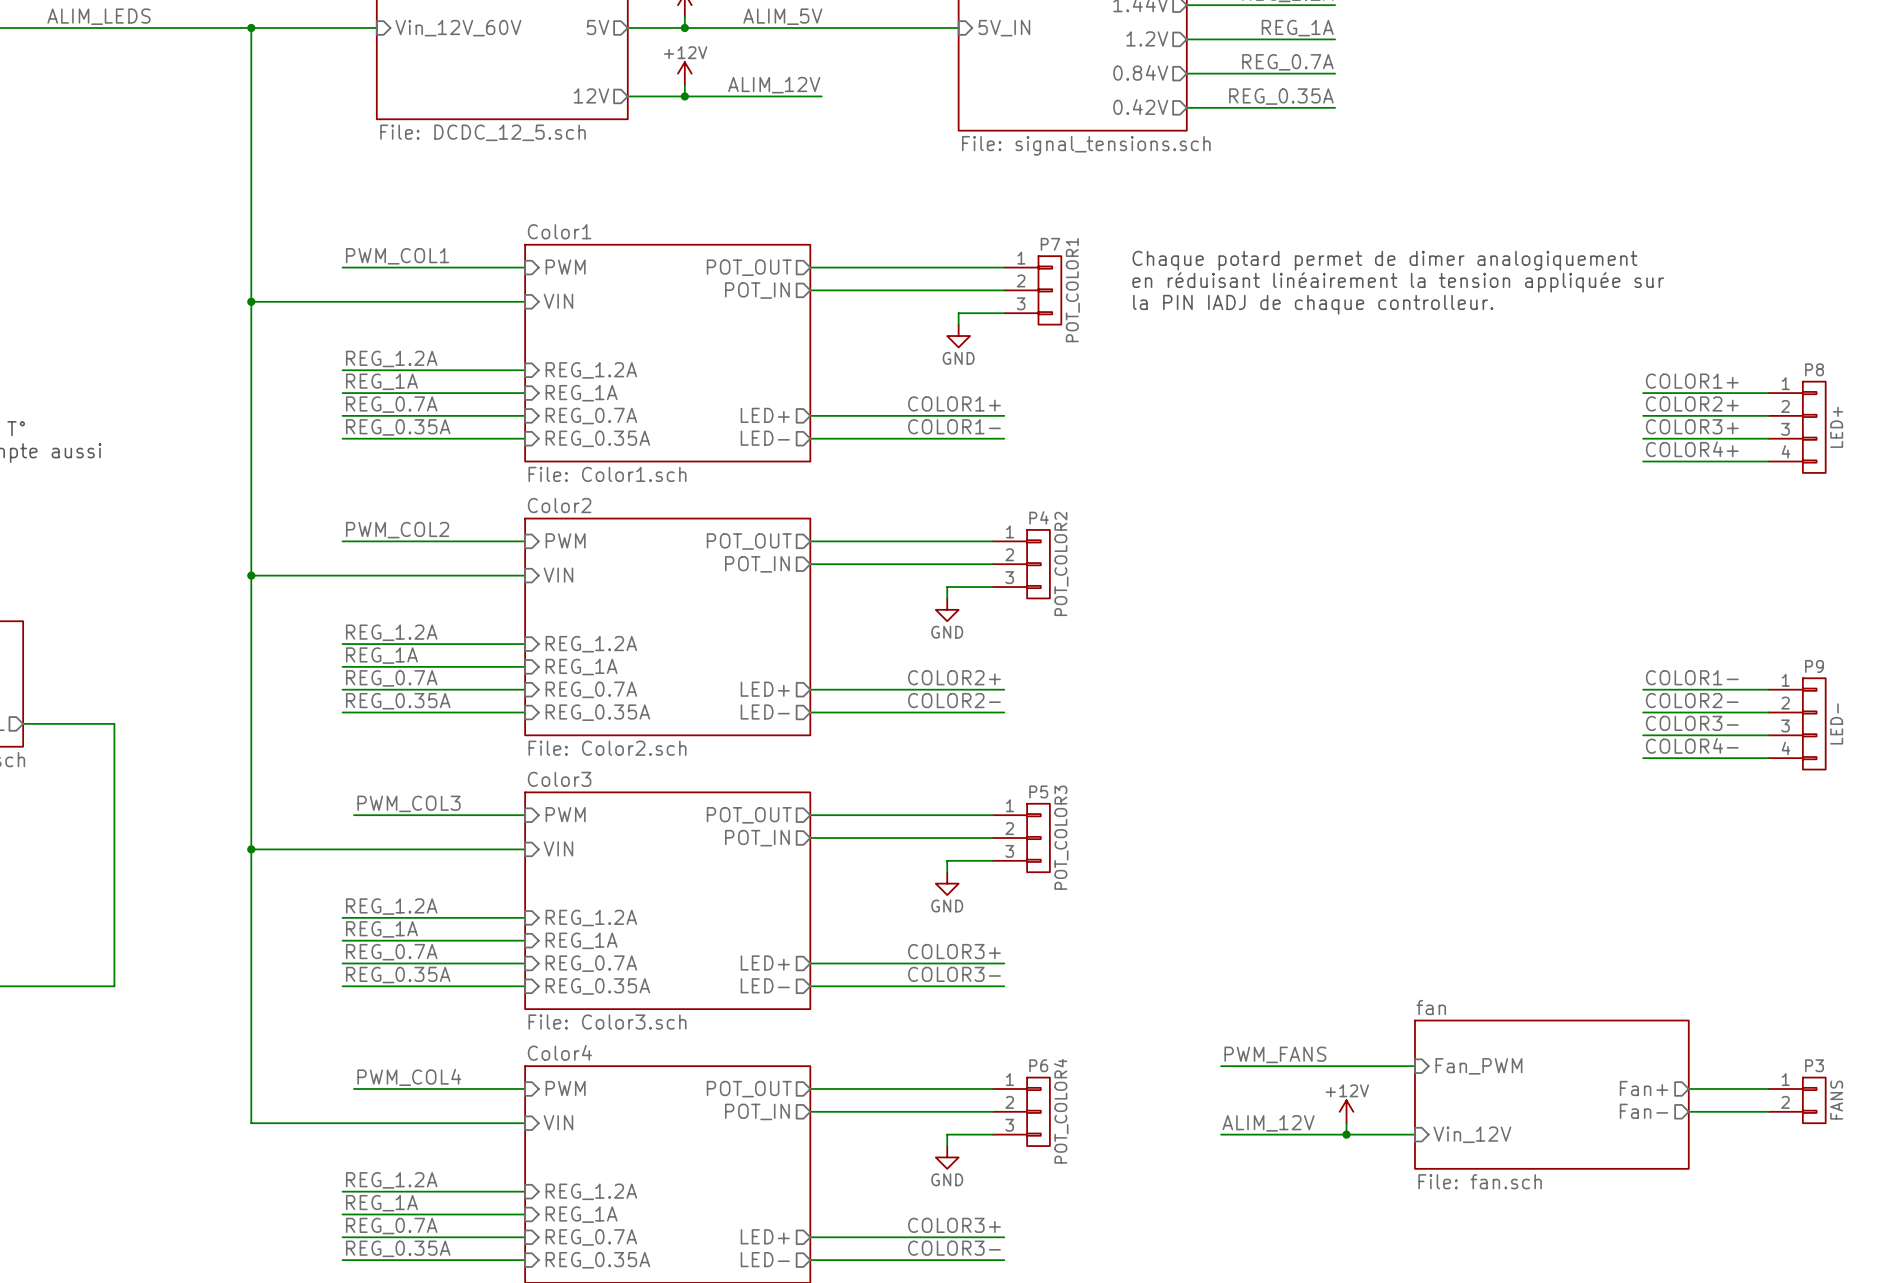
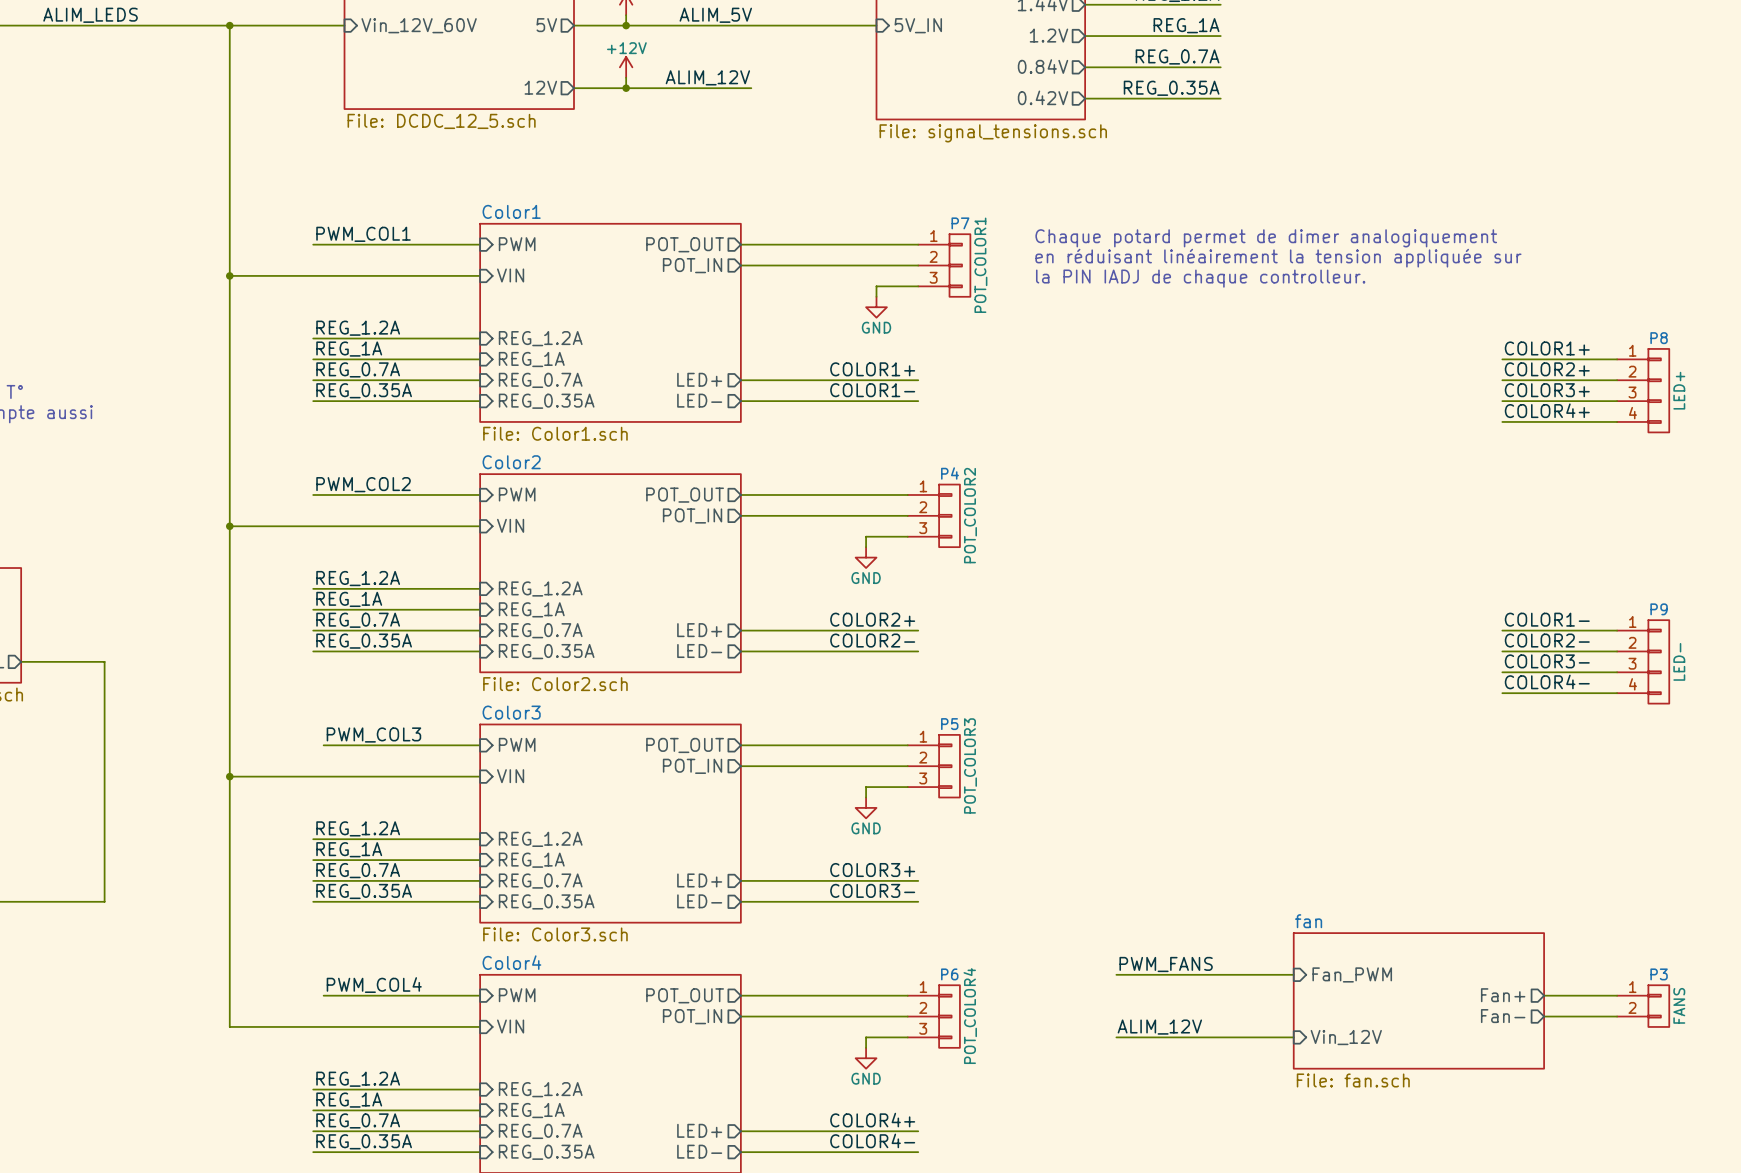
power symbol: +12V (1346, 1111) -> none
wire: (1346, 1123) (1346, 1134) -> none
junction: (1346, 1134) -> none
label: COLOR3+ (954, 1225) -> COLOR4+ (872, 1120)
label: COLOR3- (954, 1248) -> COLOR4- (872, 1140)

